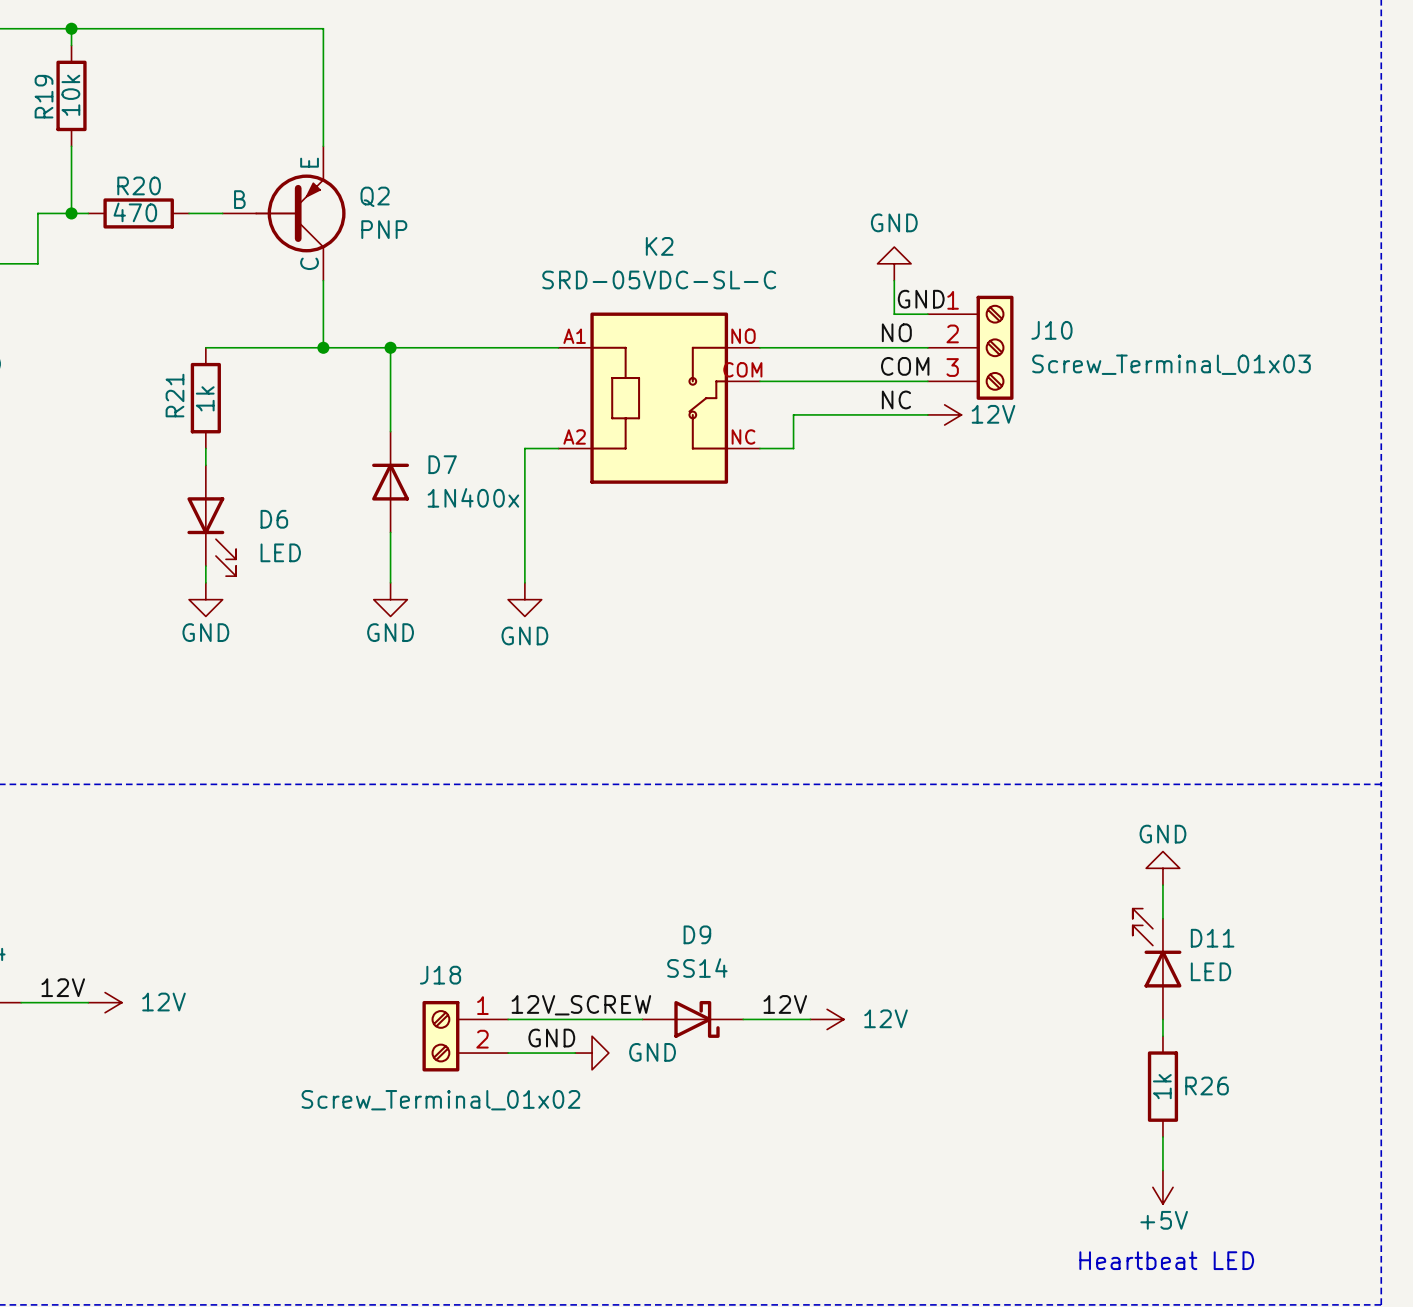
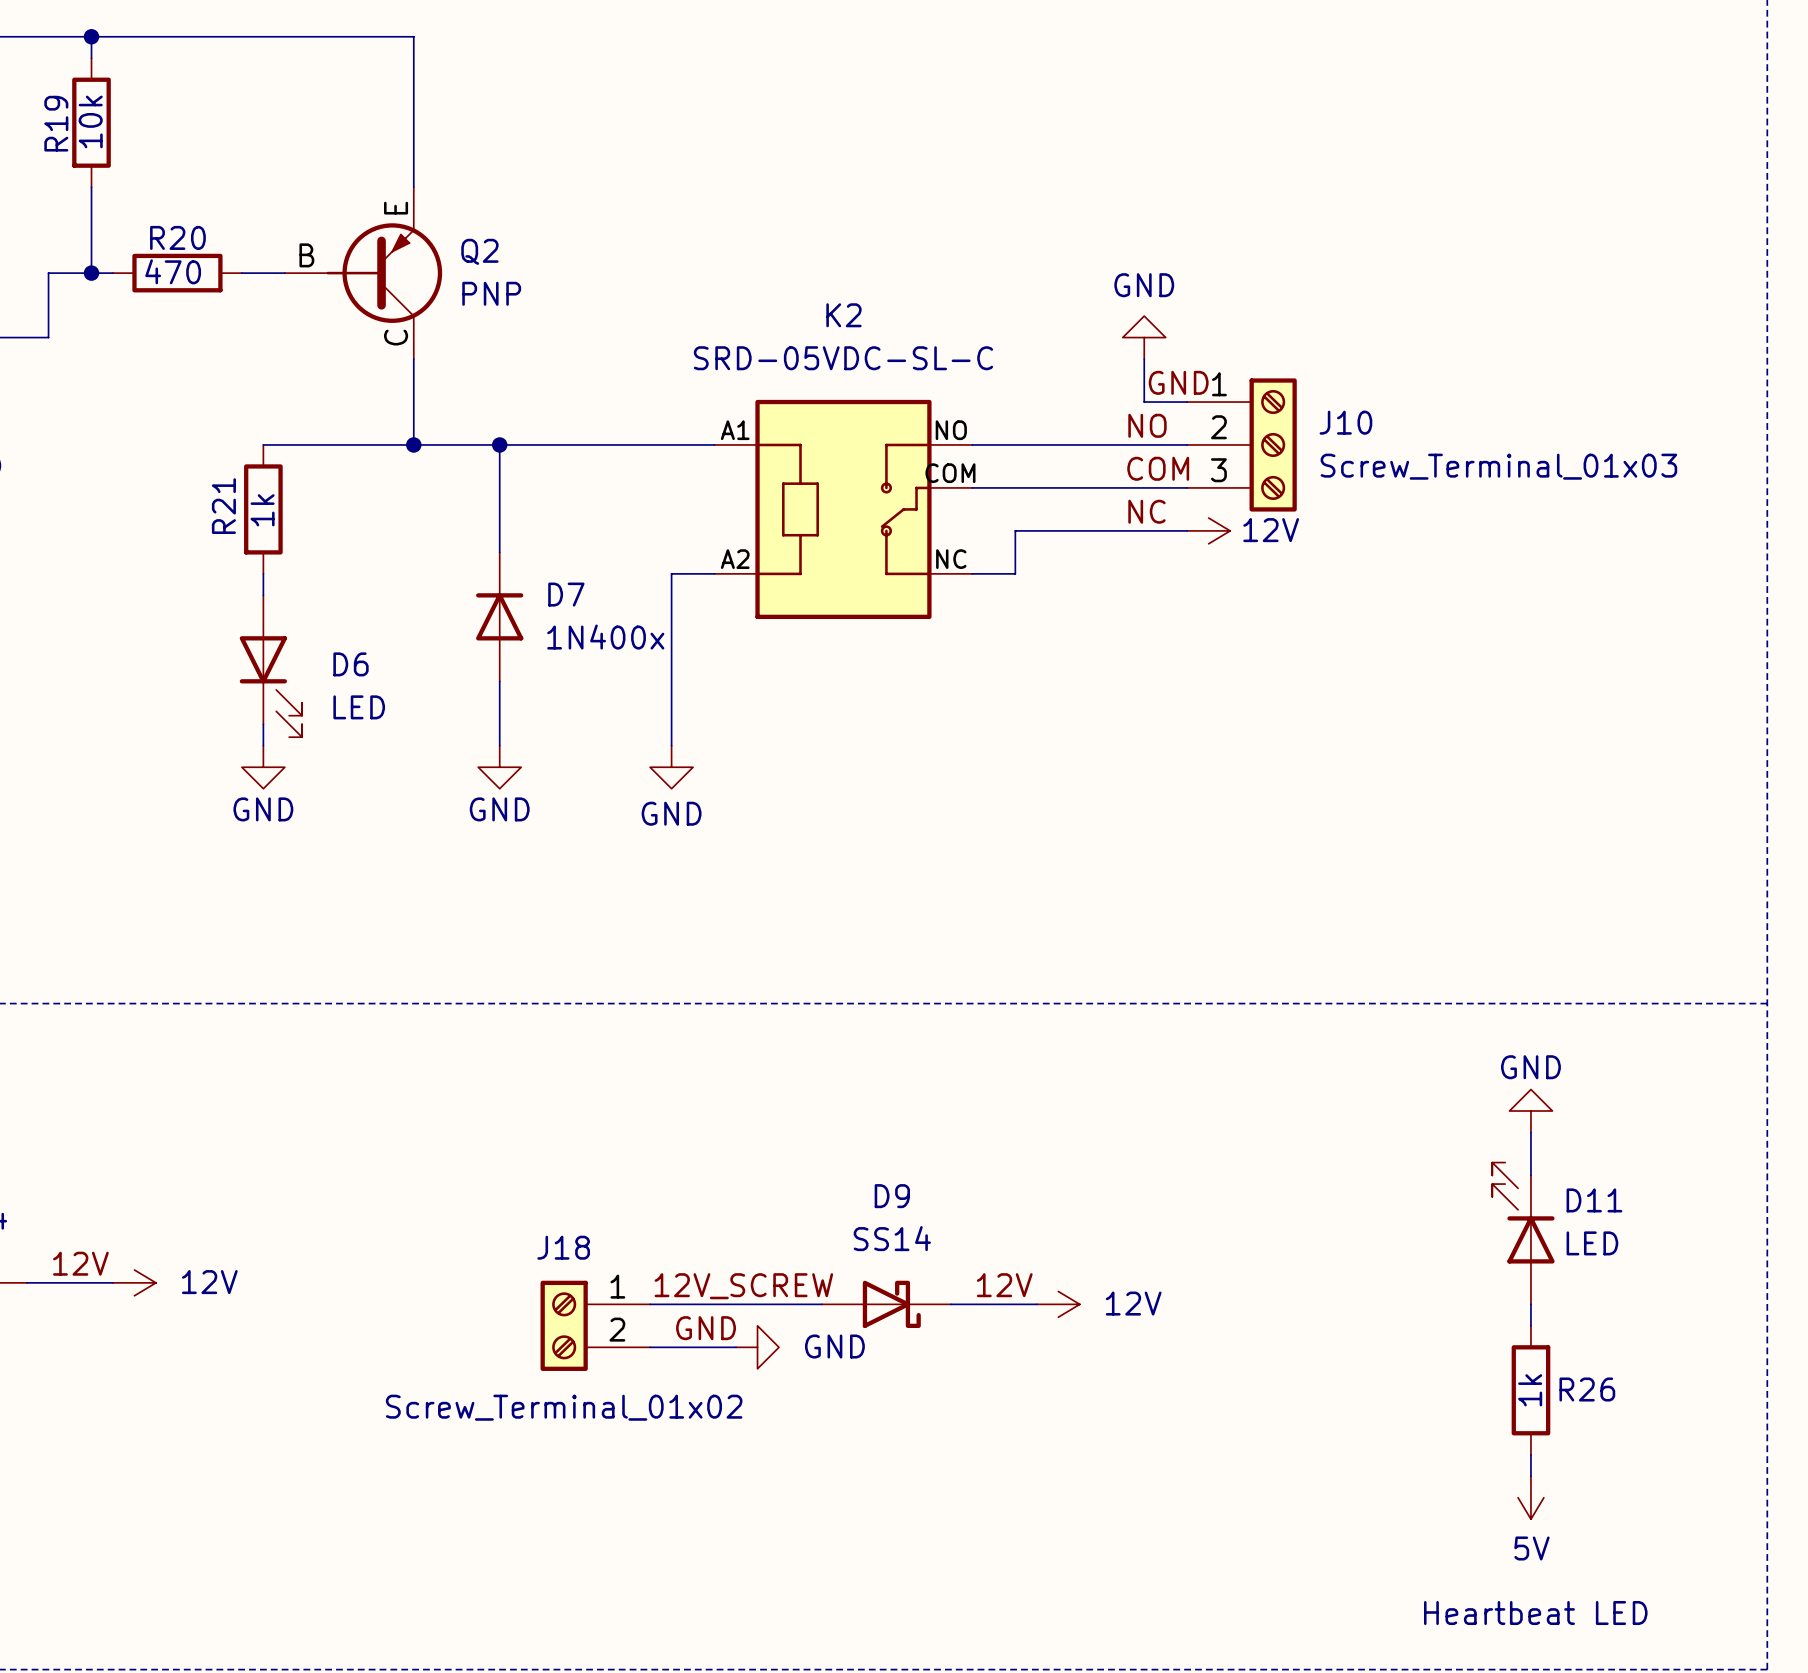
power symbol position: GND (1162, 868) -> GND (1530, 1111)
wire: (1162, 885) (1162, 918) -> (1530, 1132) (1530, 1175)
D11 position: (1157, 964) -> (1523, 1233)
wire: (1162, 1019) (1162, 1036) -> (1530, 1304) (1530, 1325)
R26 position: (1162, 1086) -> (1530, 1390)
wire: (1162, 1136) (1162, 1170) -> none
wire: none -> (1530, 1454) (1530, 1476)
power symbol: none -> 5V (1530, 1497)
power symbol: +5V (1162, 1187) -> none
text position: Heartbeat LED (1166, 1260) -> Heartbeat LED (1535, 1613)

